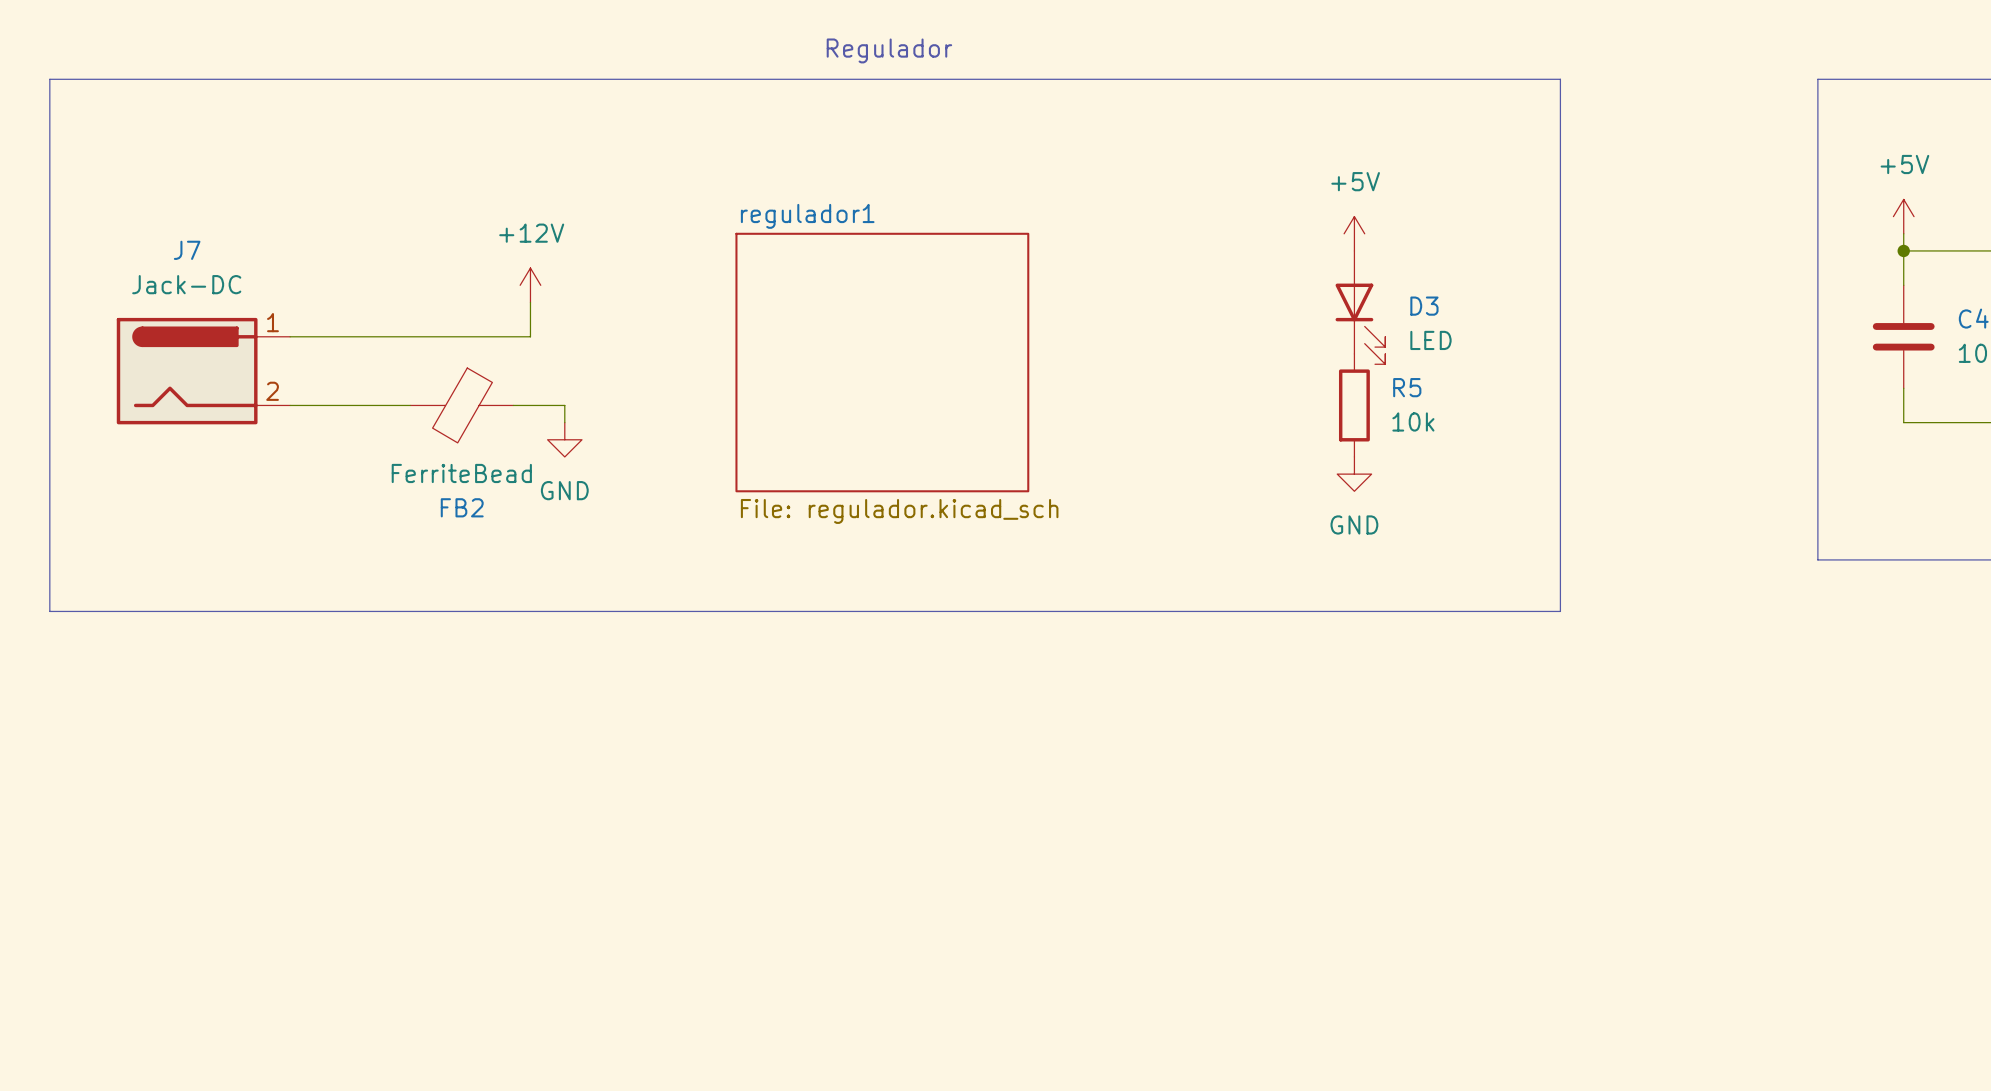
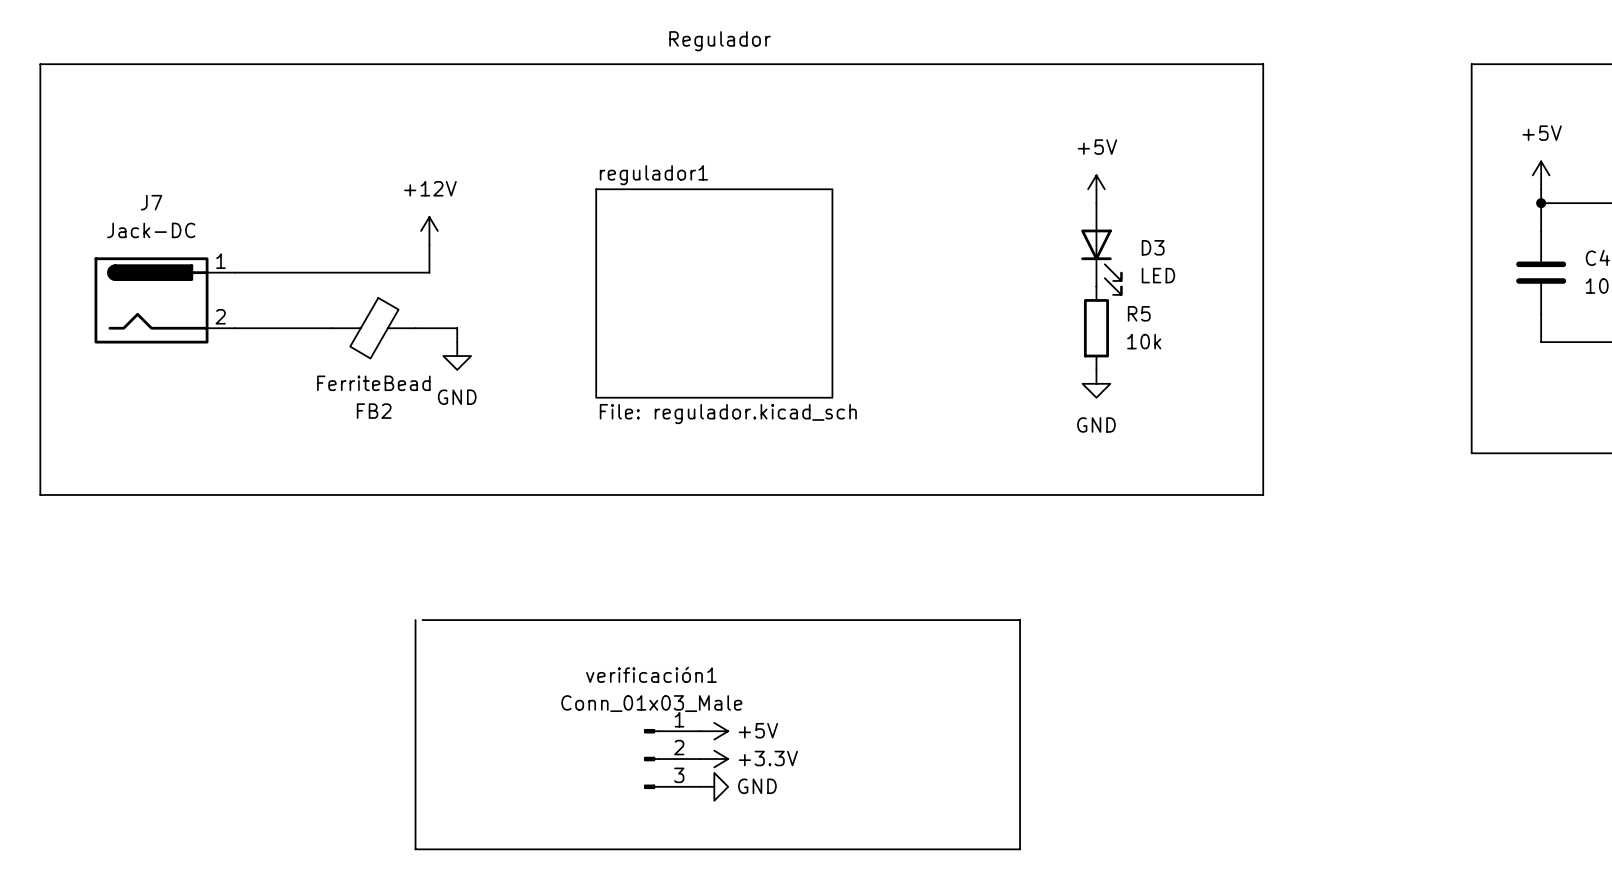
line: none -> (415, 620) (415, 849) (1020, 849) (1020, 620) (422, 620)
power symbol: none -> +5V (714, 731)
verificación1: none -> Conn_01x03_Male (672, 759)
power symbol: none -> +3.3V (714, 759)
power symbol: none -> GND (714, 786)

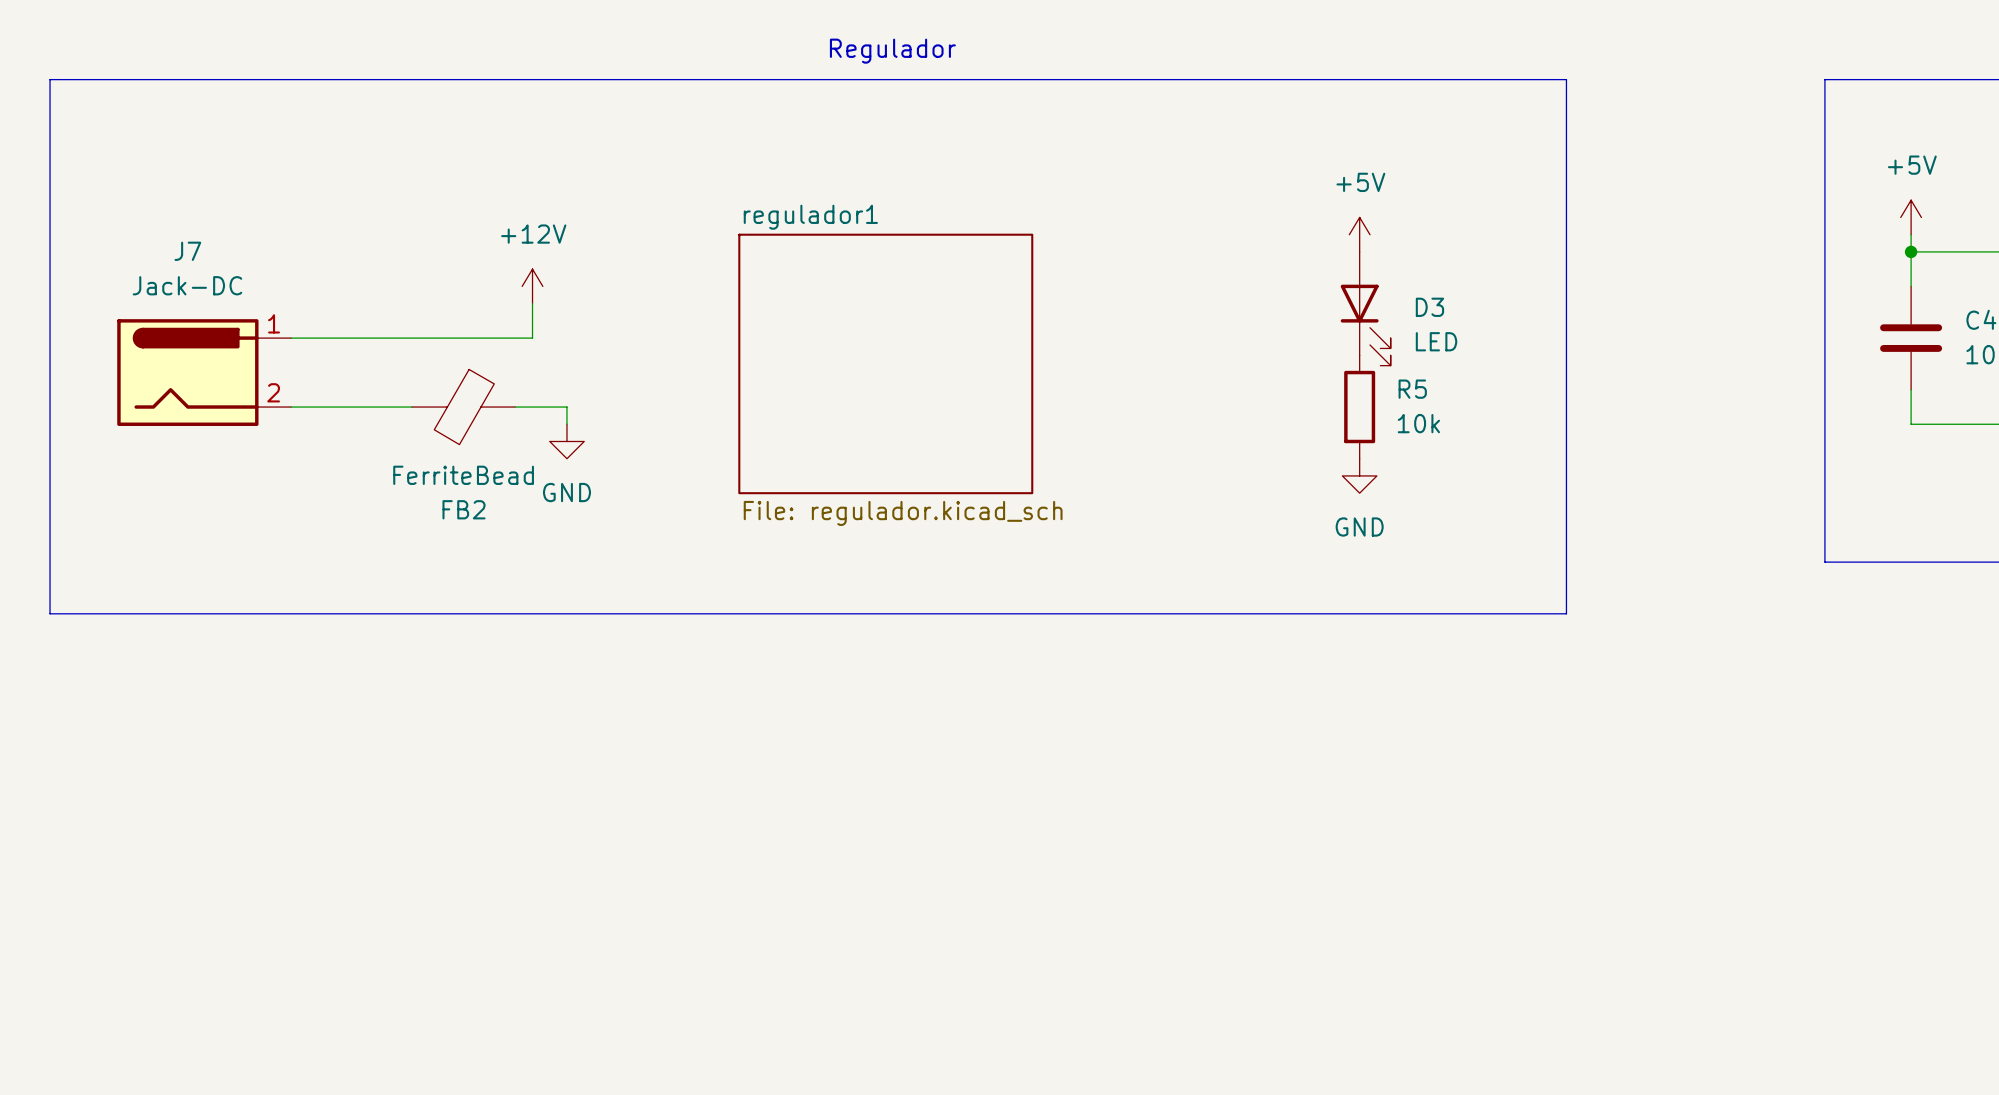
line: (415, 620) (415, 849) (1020, 849) (1020, 620) (422, 620) -> none
power symbol: +5V (714, 731) -> none
verificación1: Conn_01x03_Male (672, 759) -> none
power symbol: +3.3V (714, 759) -> none
power symbol: GND (714, 786) -> none

